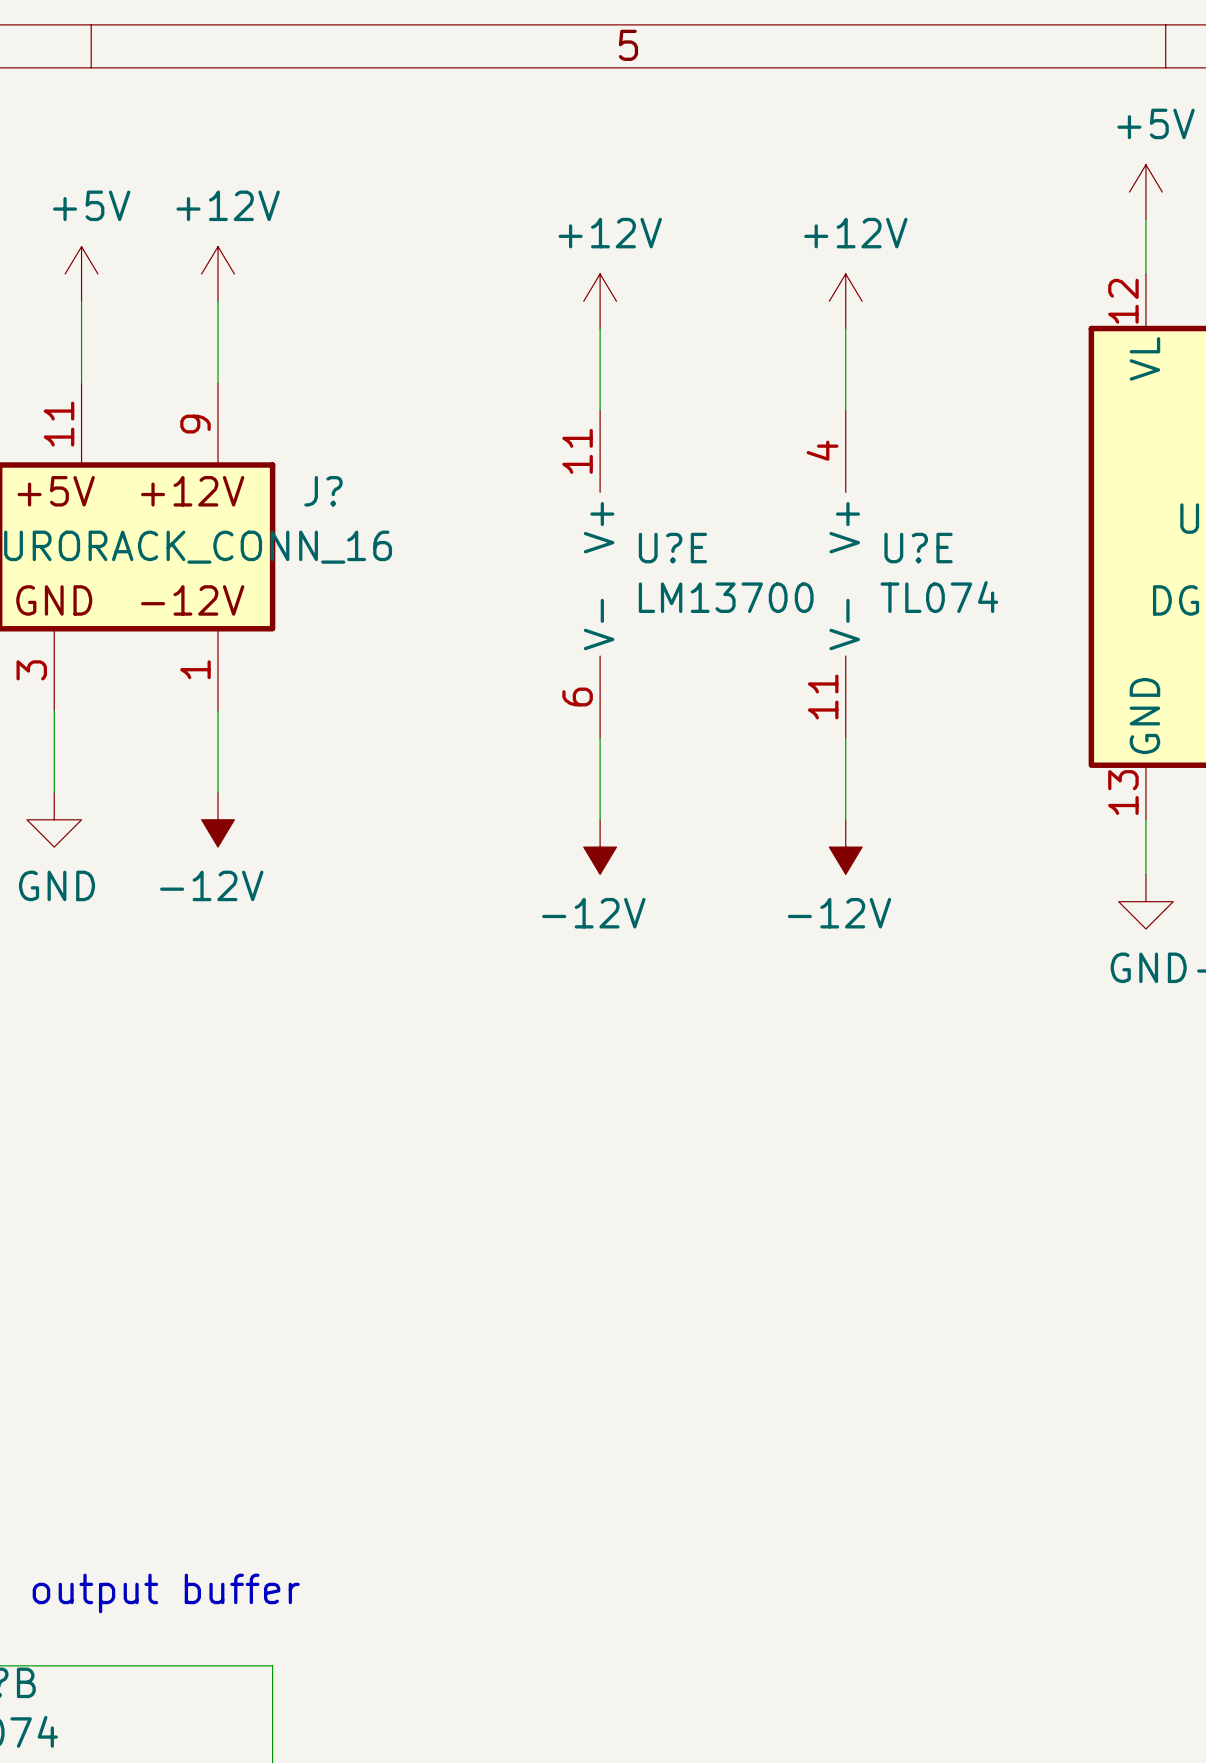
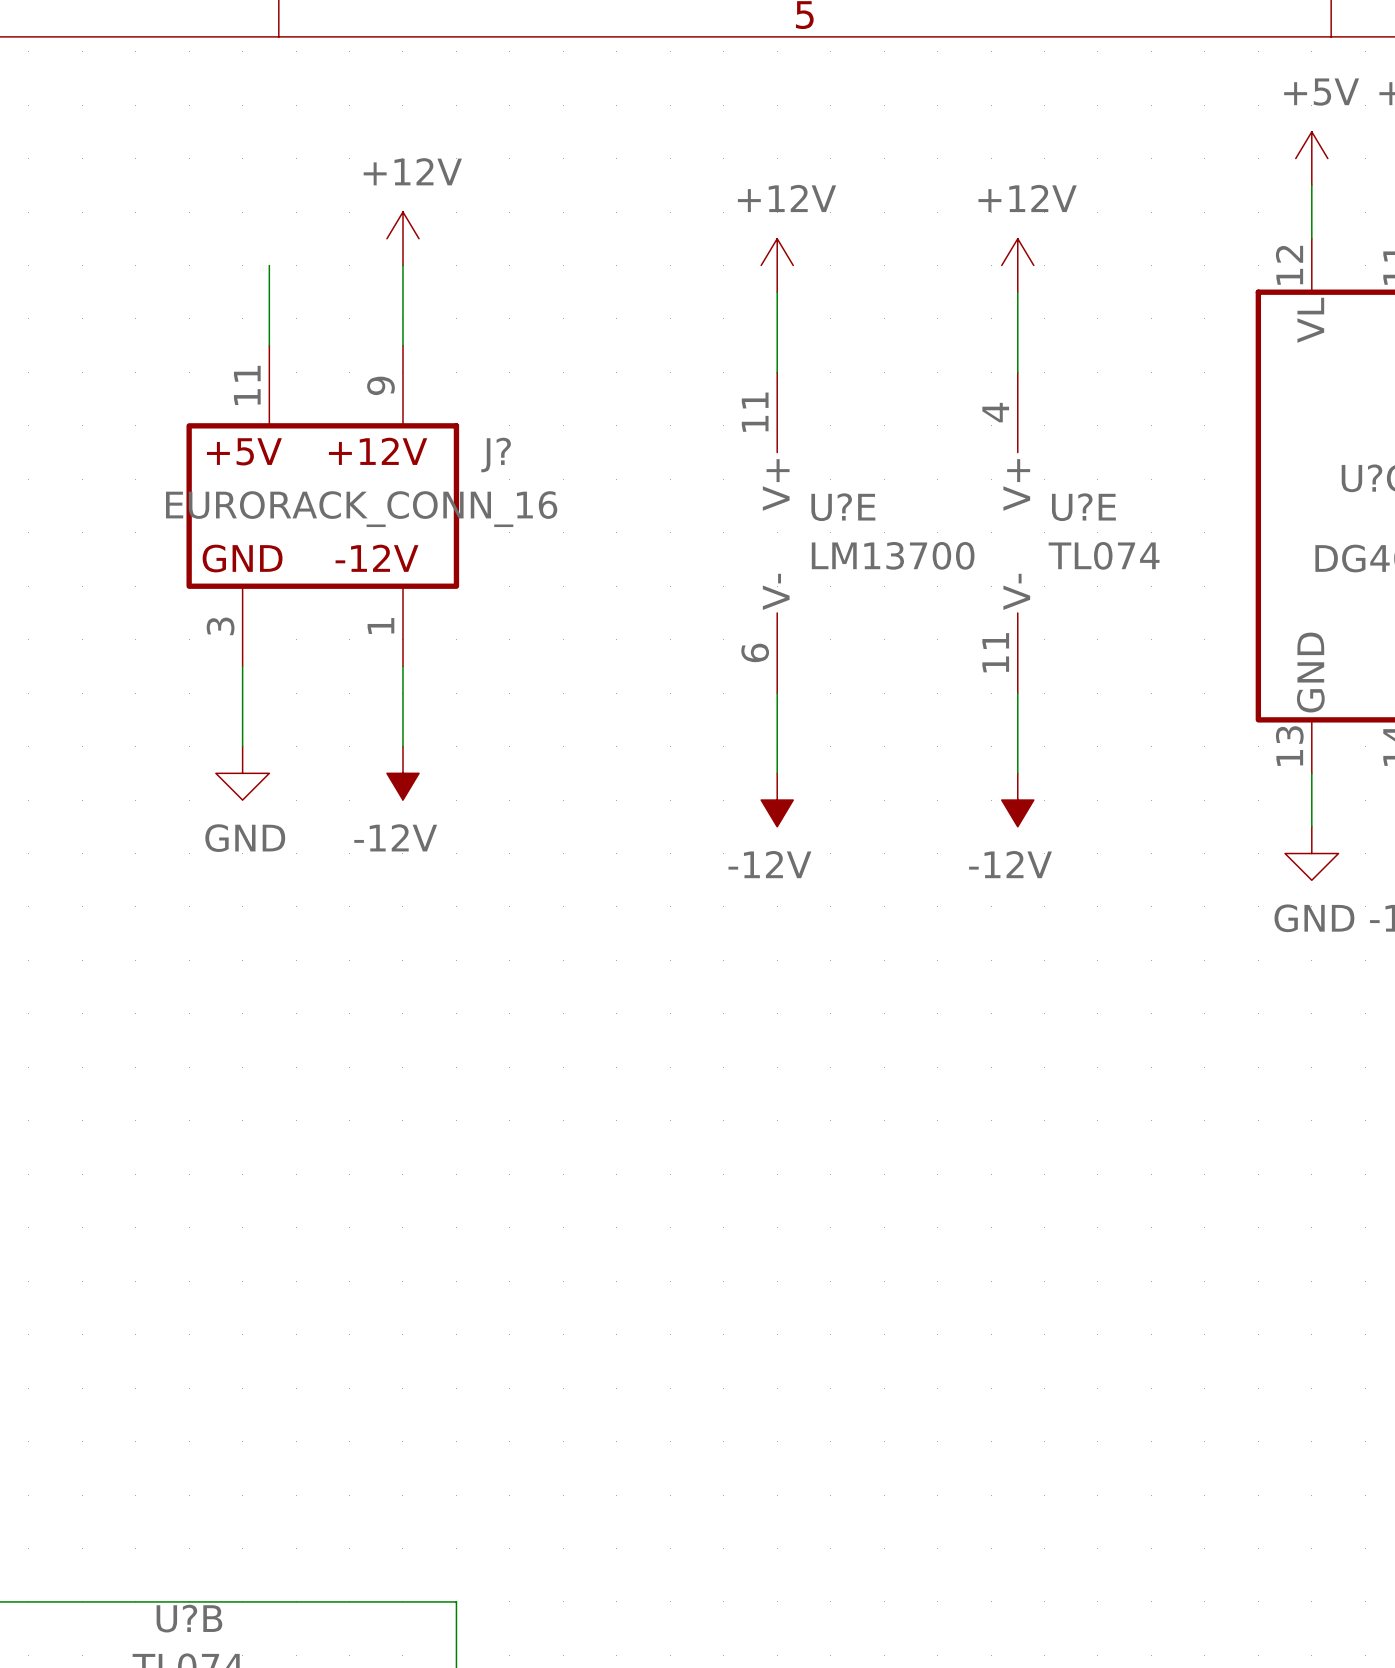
power symbol: +5V (81, 273) -> none
text: output buffer (166, 1593) -> none

